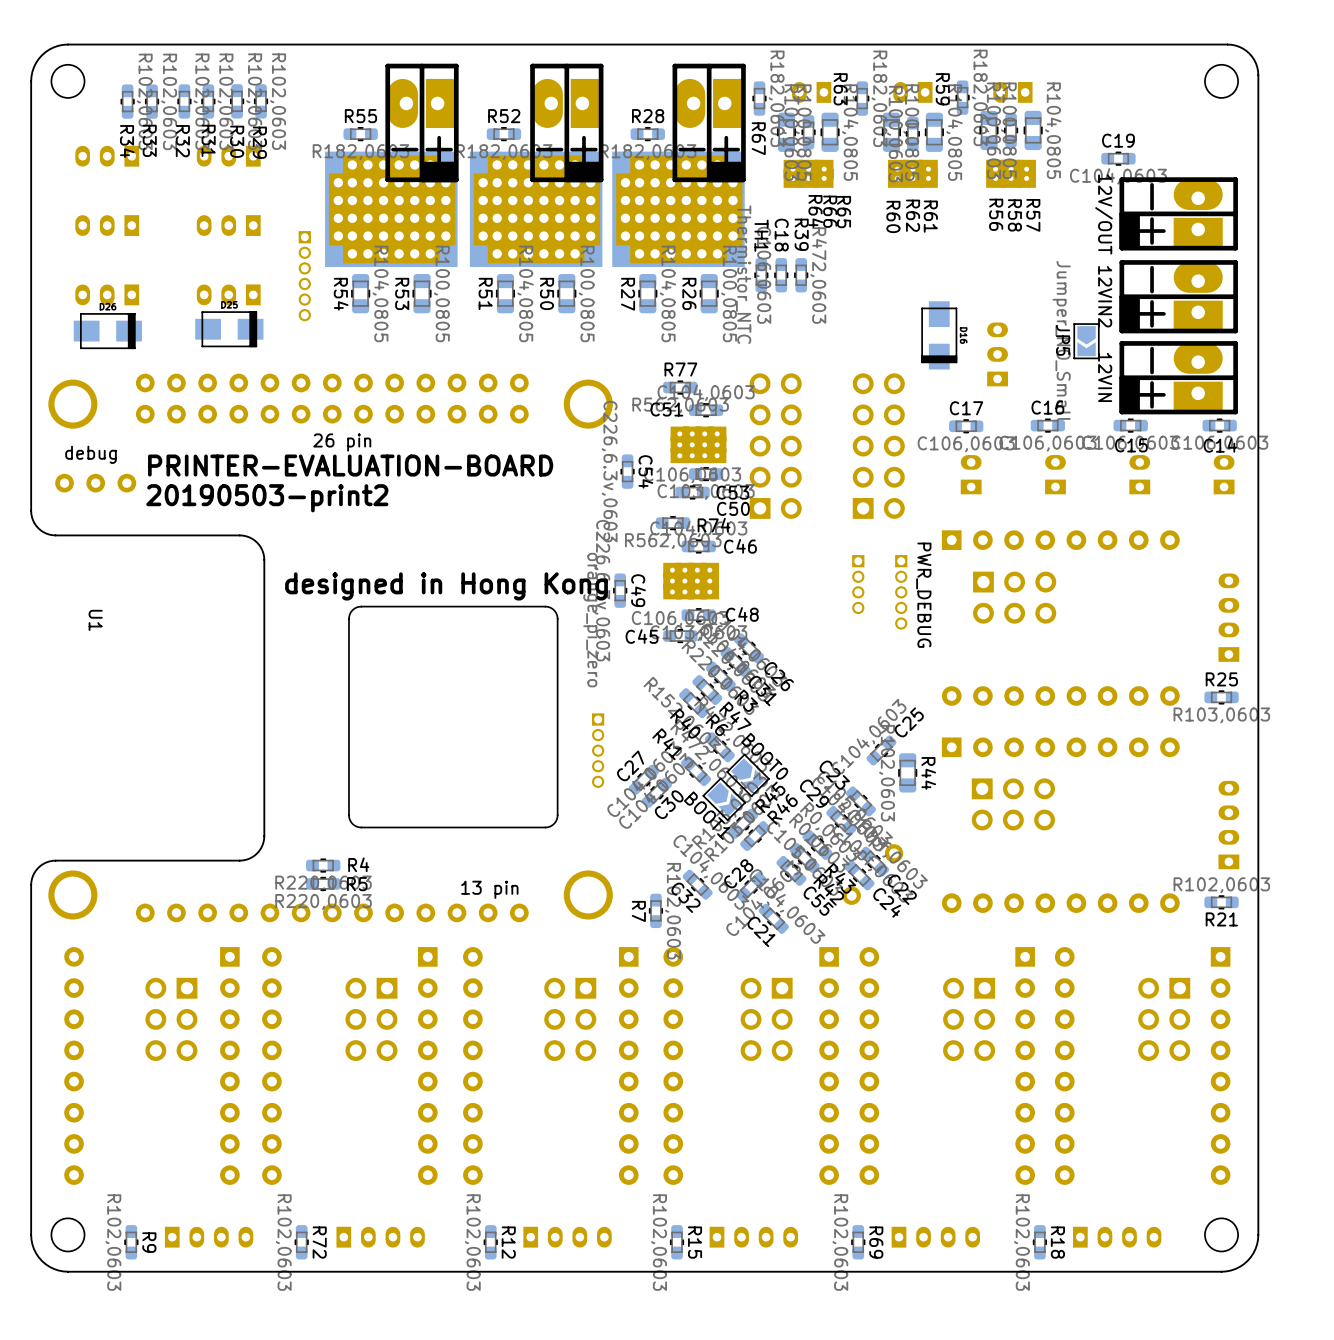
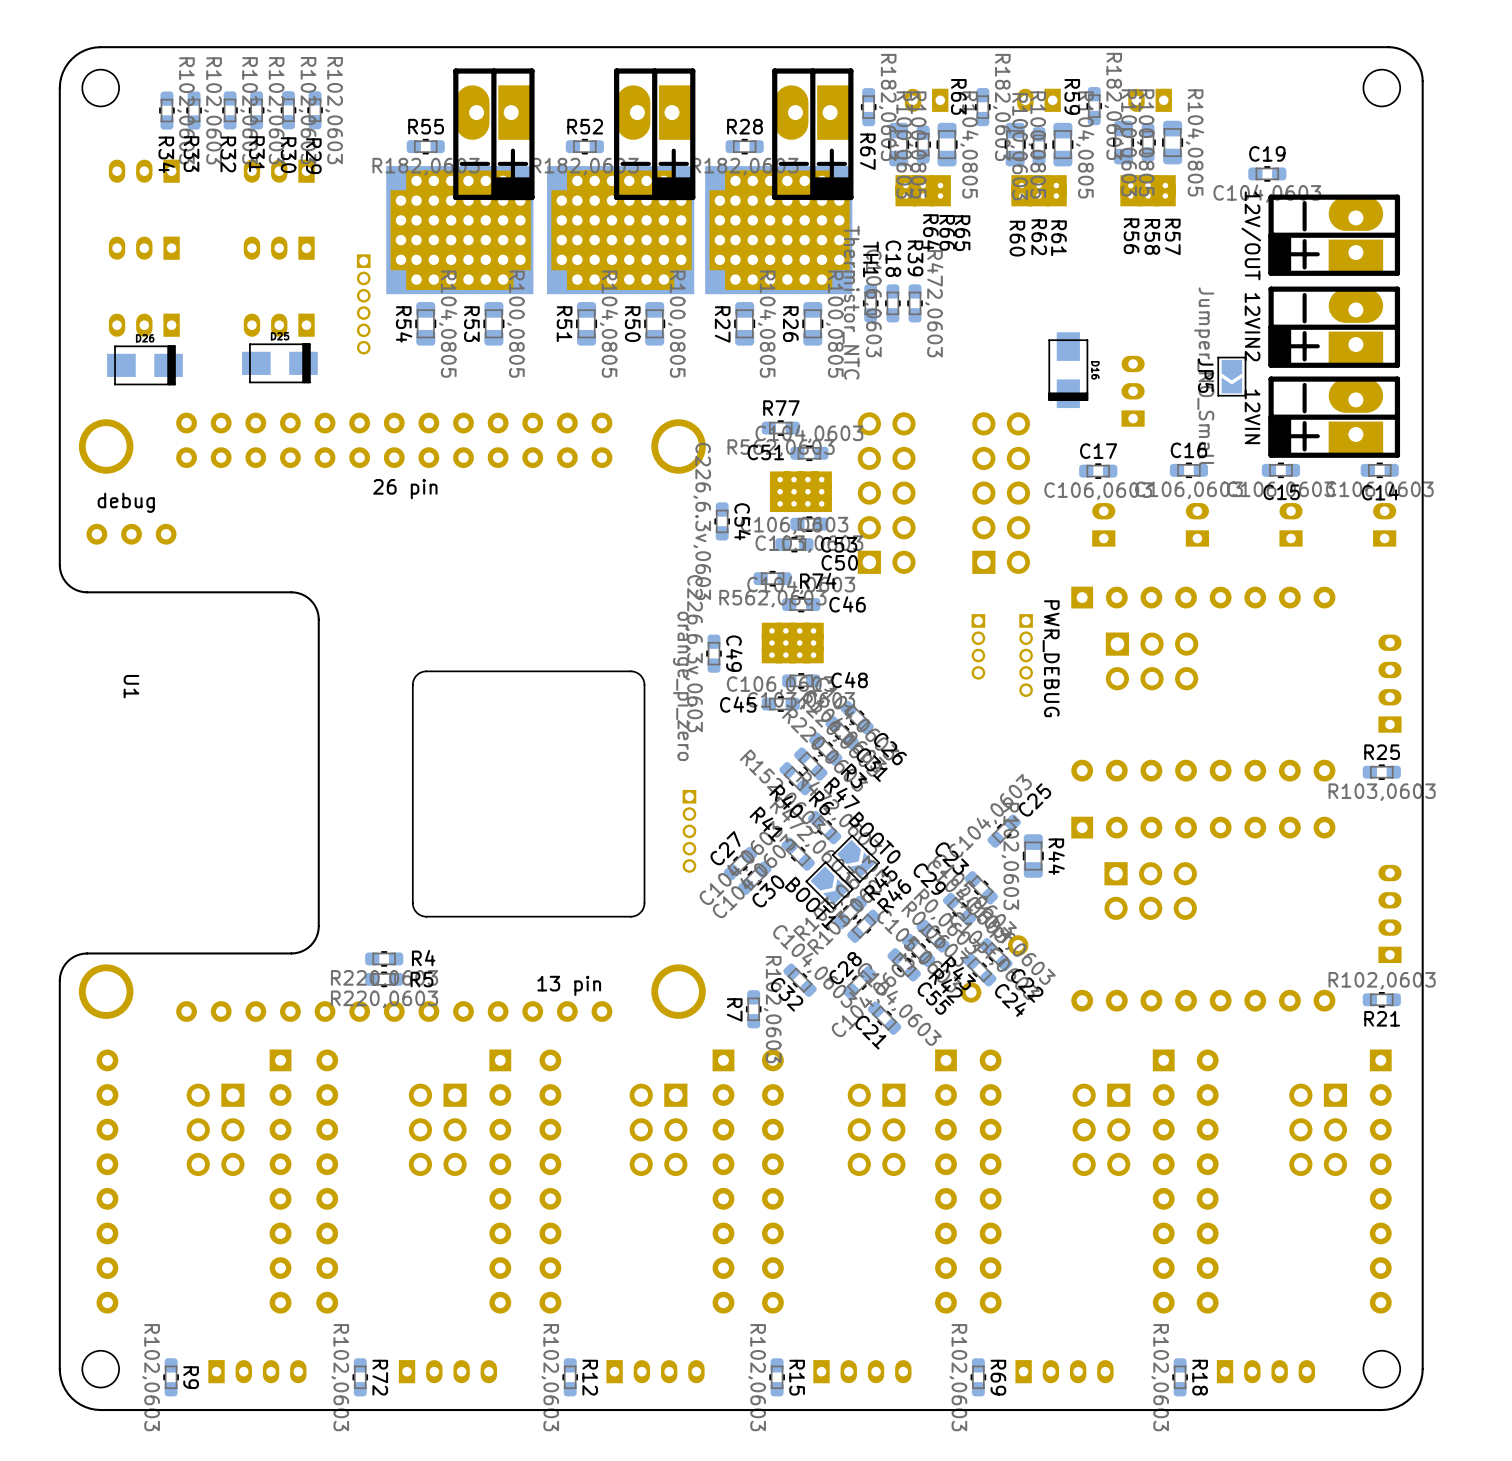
text: PRINTER-EVALUATION-BOARD (350, 465) -> none
text: 20190503-print2 (267, 498) -> none
text: designed in Hong Kong (446, 586) -> none

